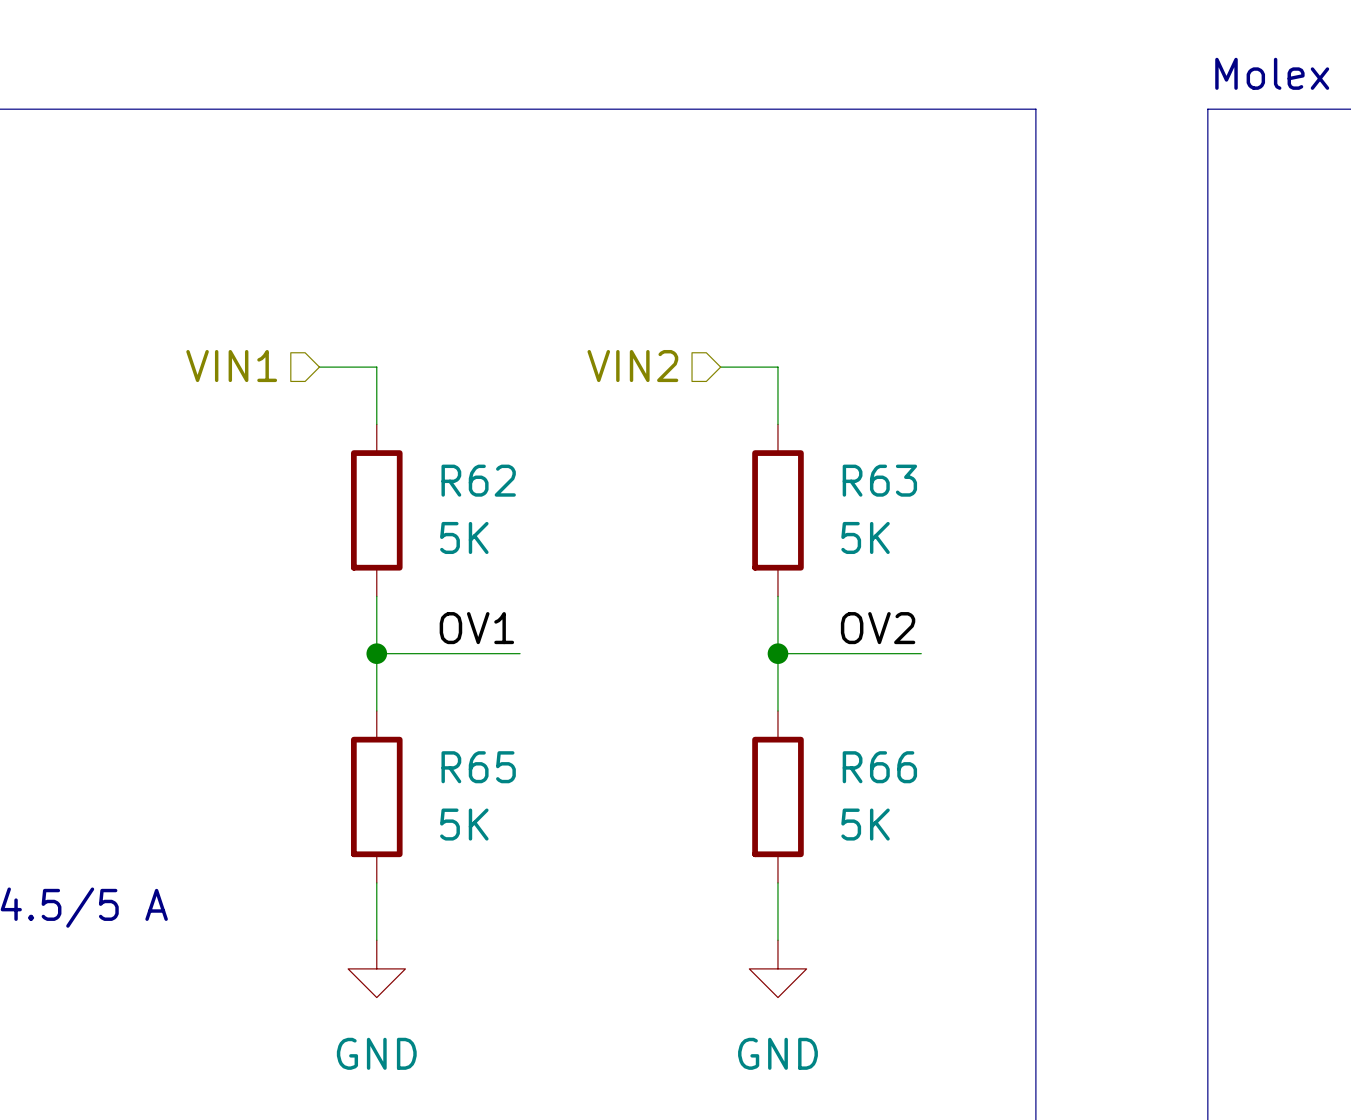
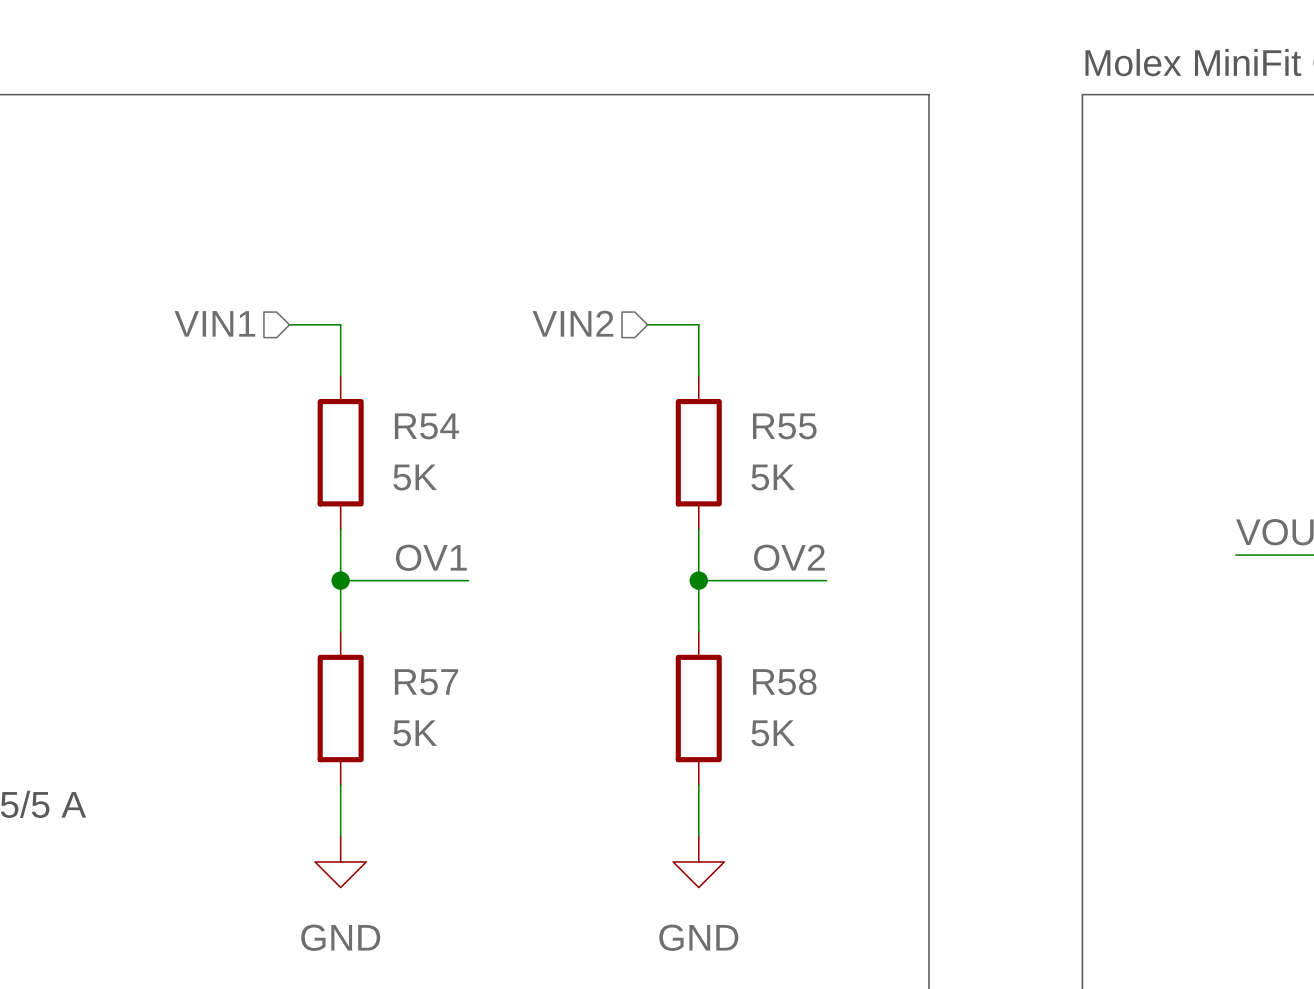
R62 name: R62 (478, 480) -> R54 (426, 426)
R63 name: R63 (879, 480) -> R55 (784, 426)
R65 name: R65 (478, 767) -> R57 (426, 682)
R66 name: R66 (879, 767) -> R58 (784, 681)

